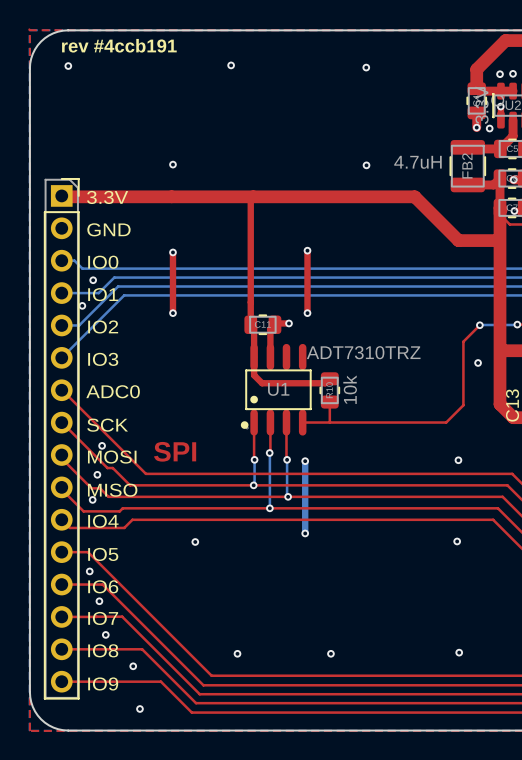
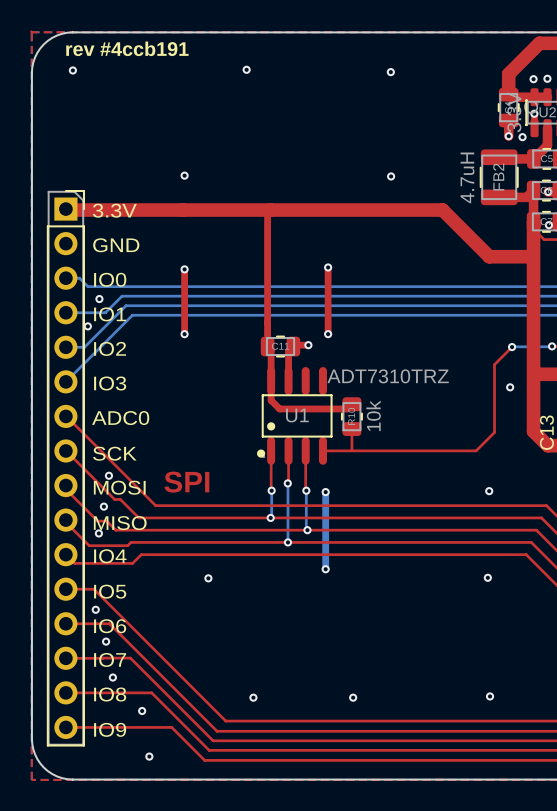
FB2 value rotation: 0° (417, 162) -> 90° counterclockwise (467, 177)

